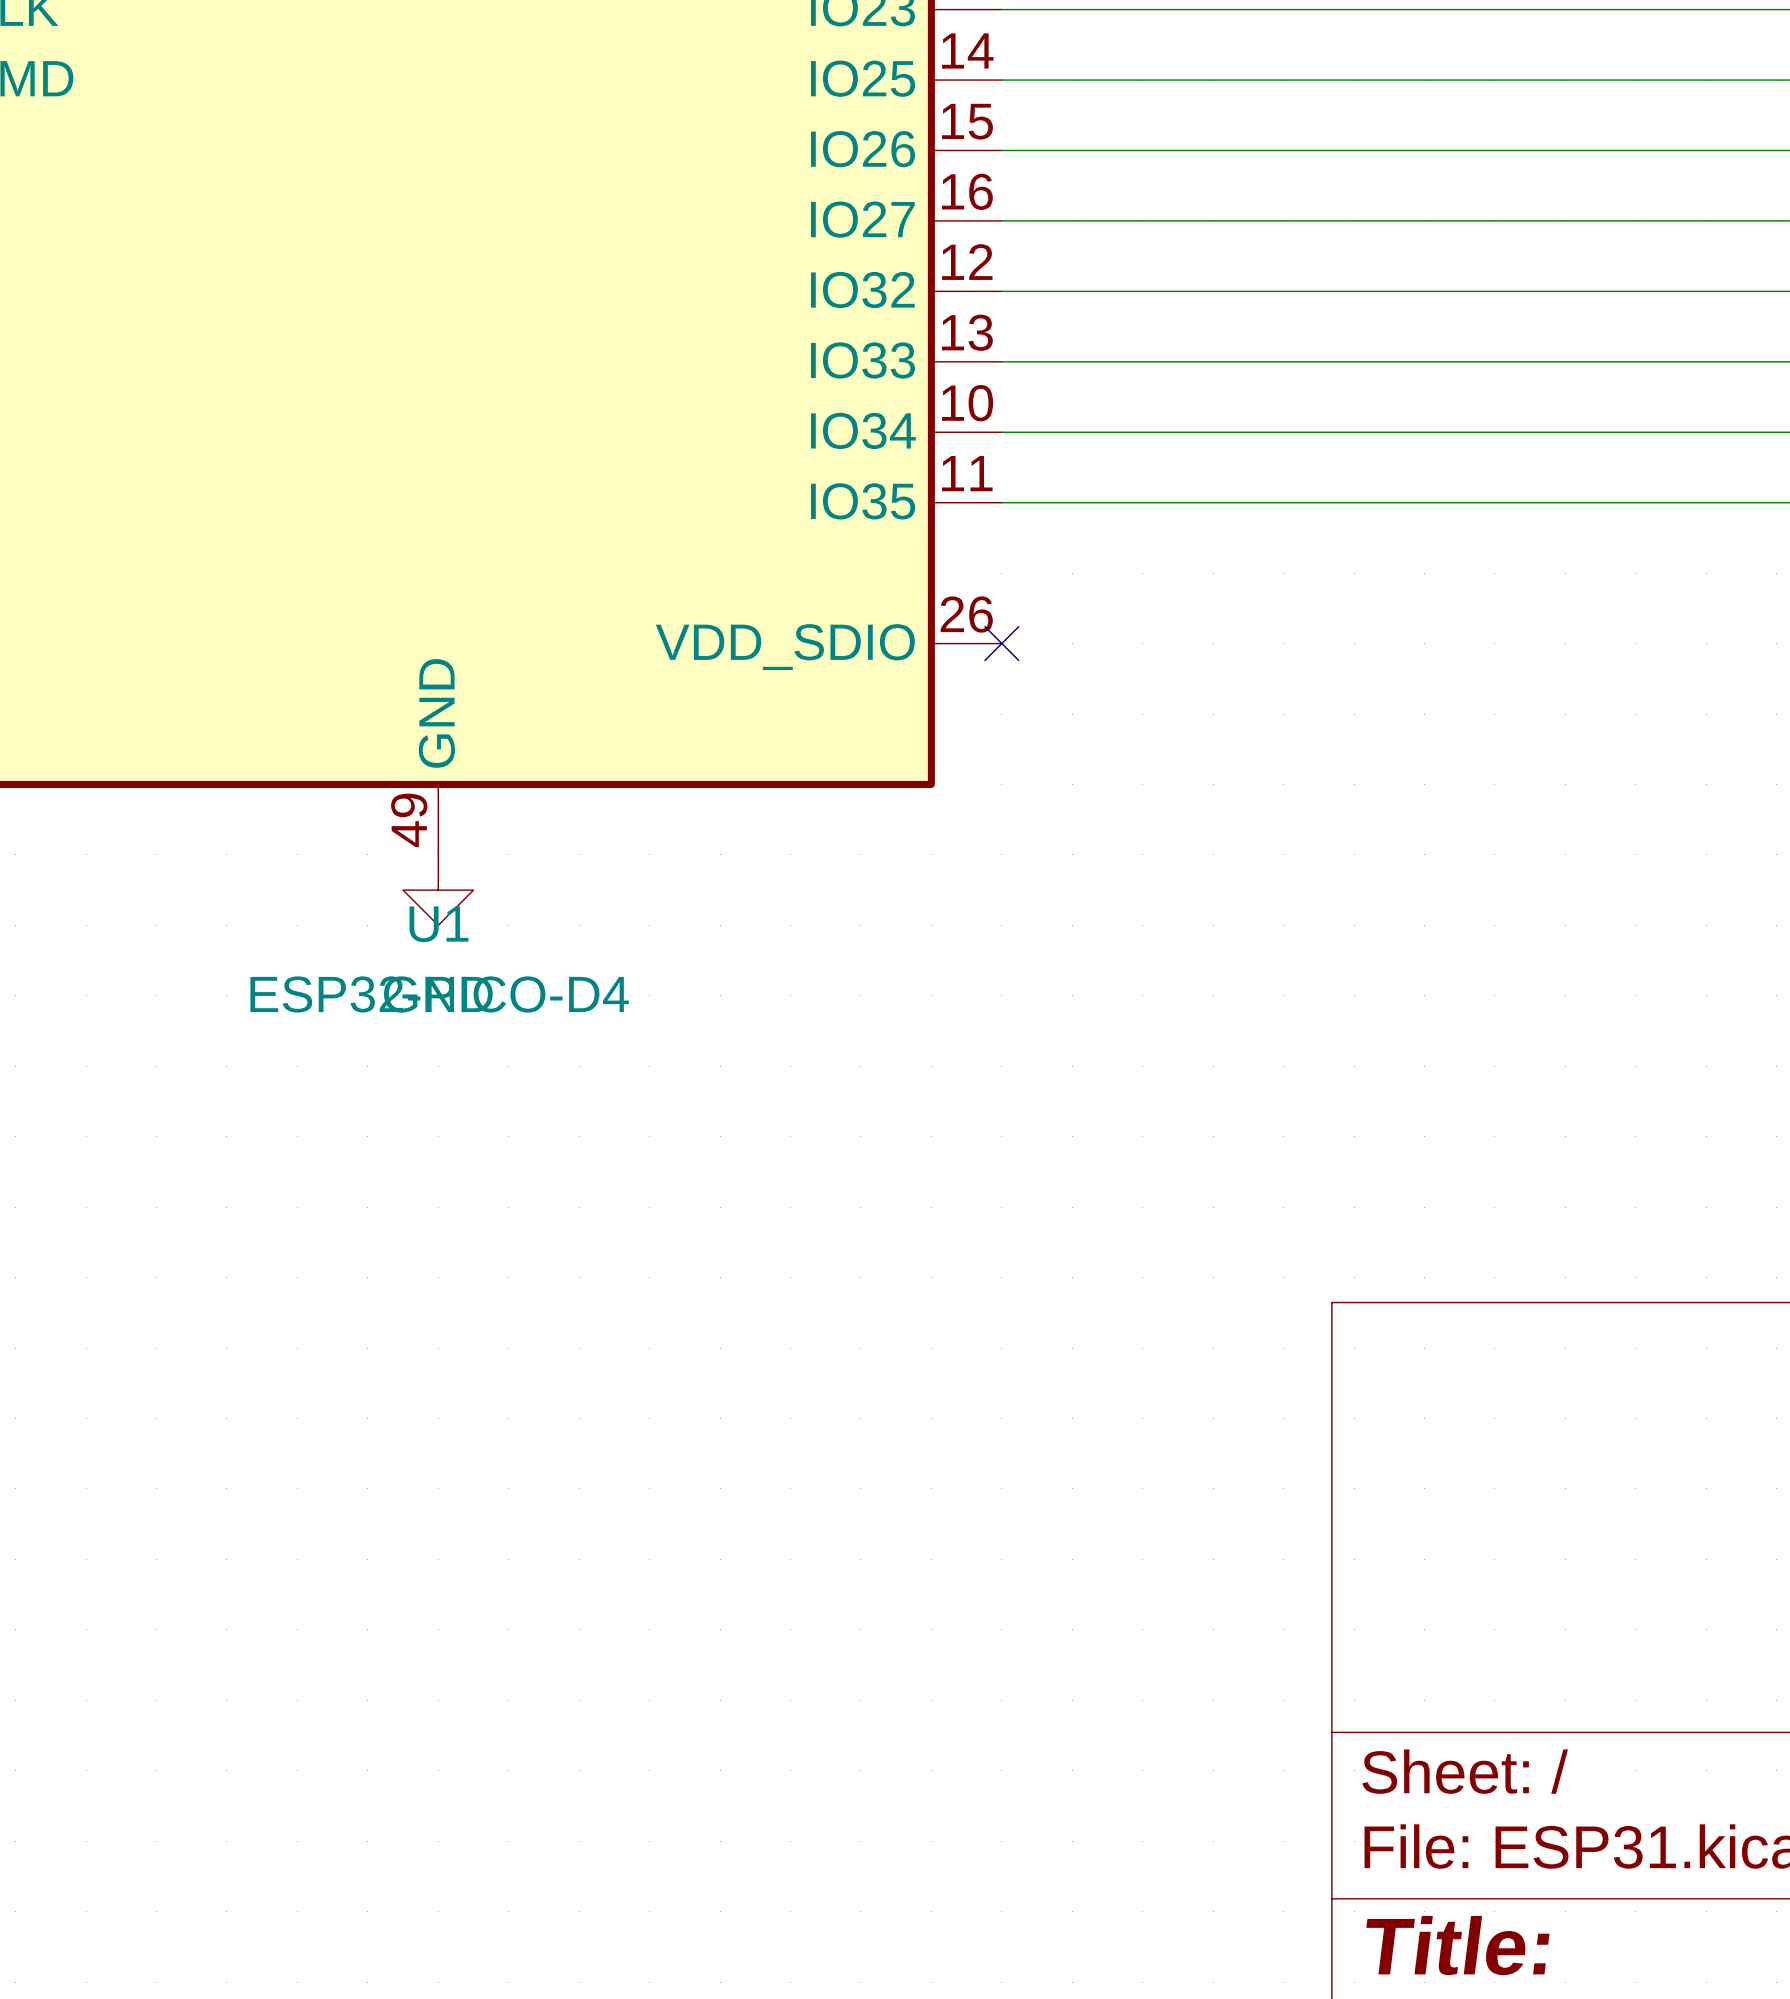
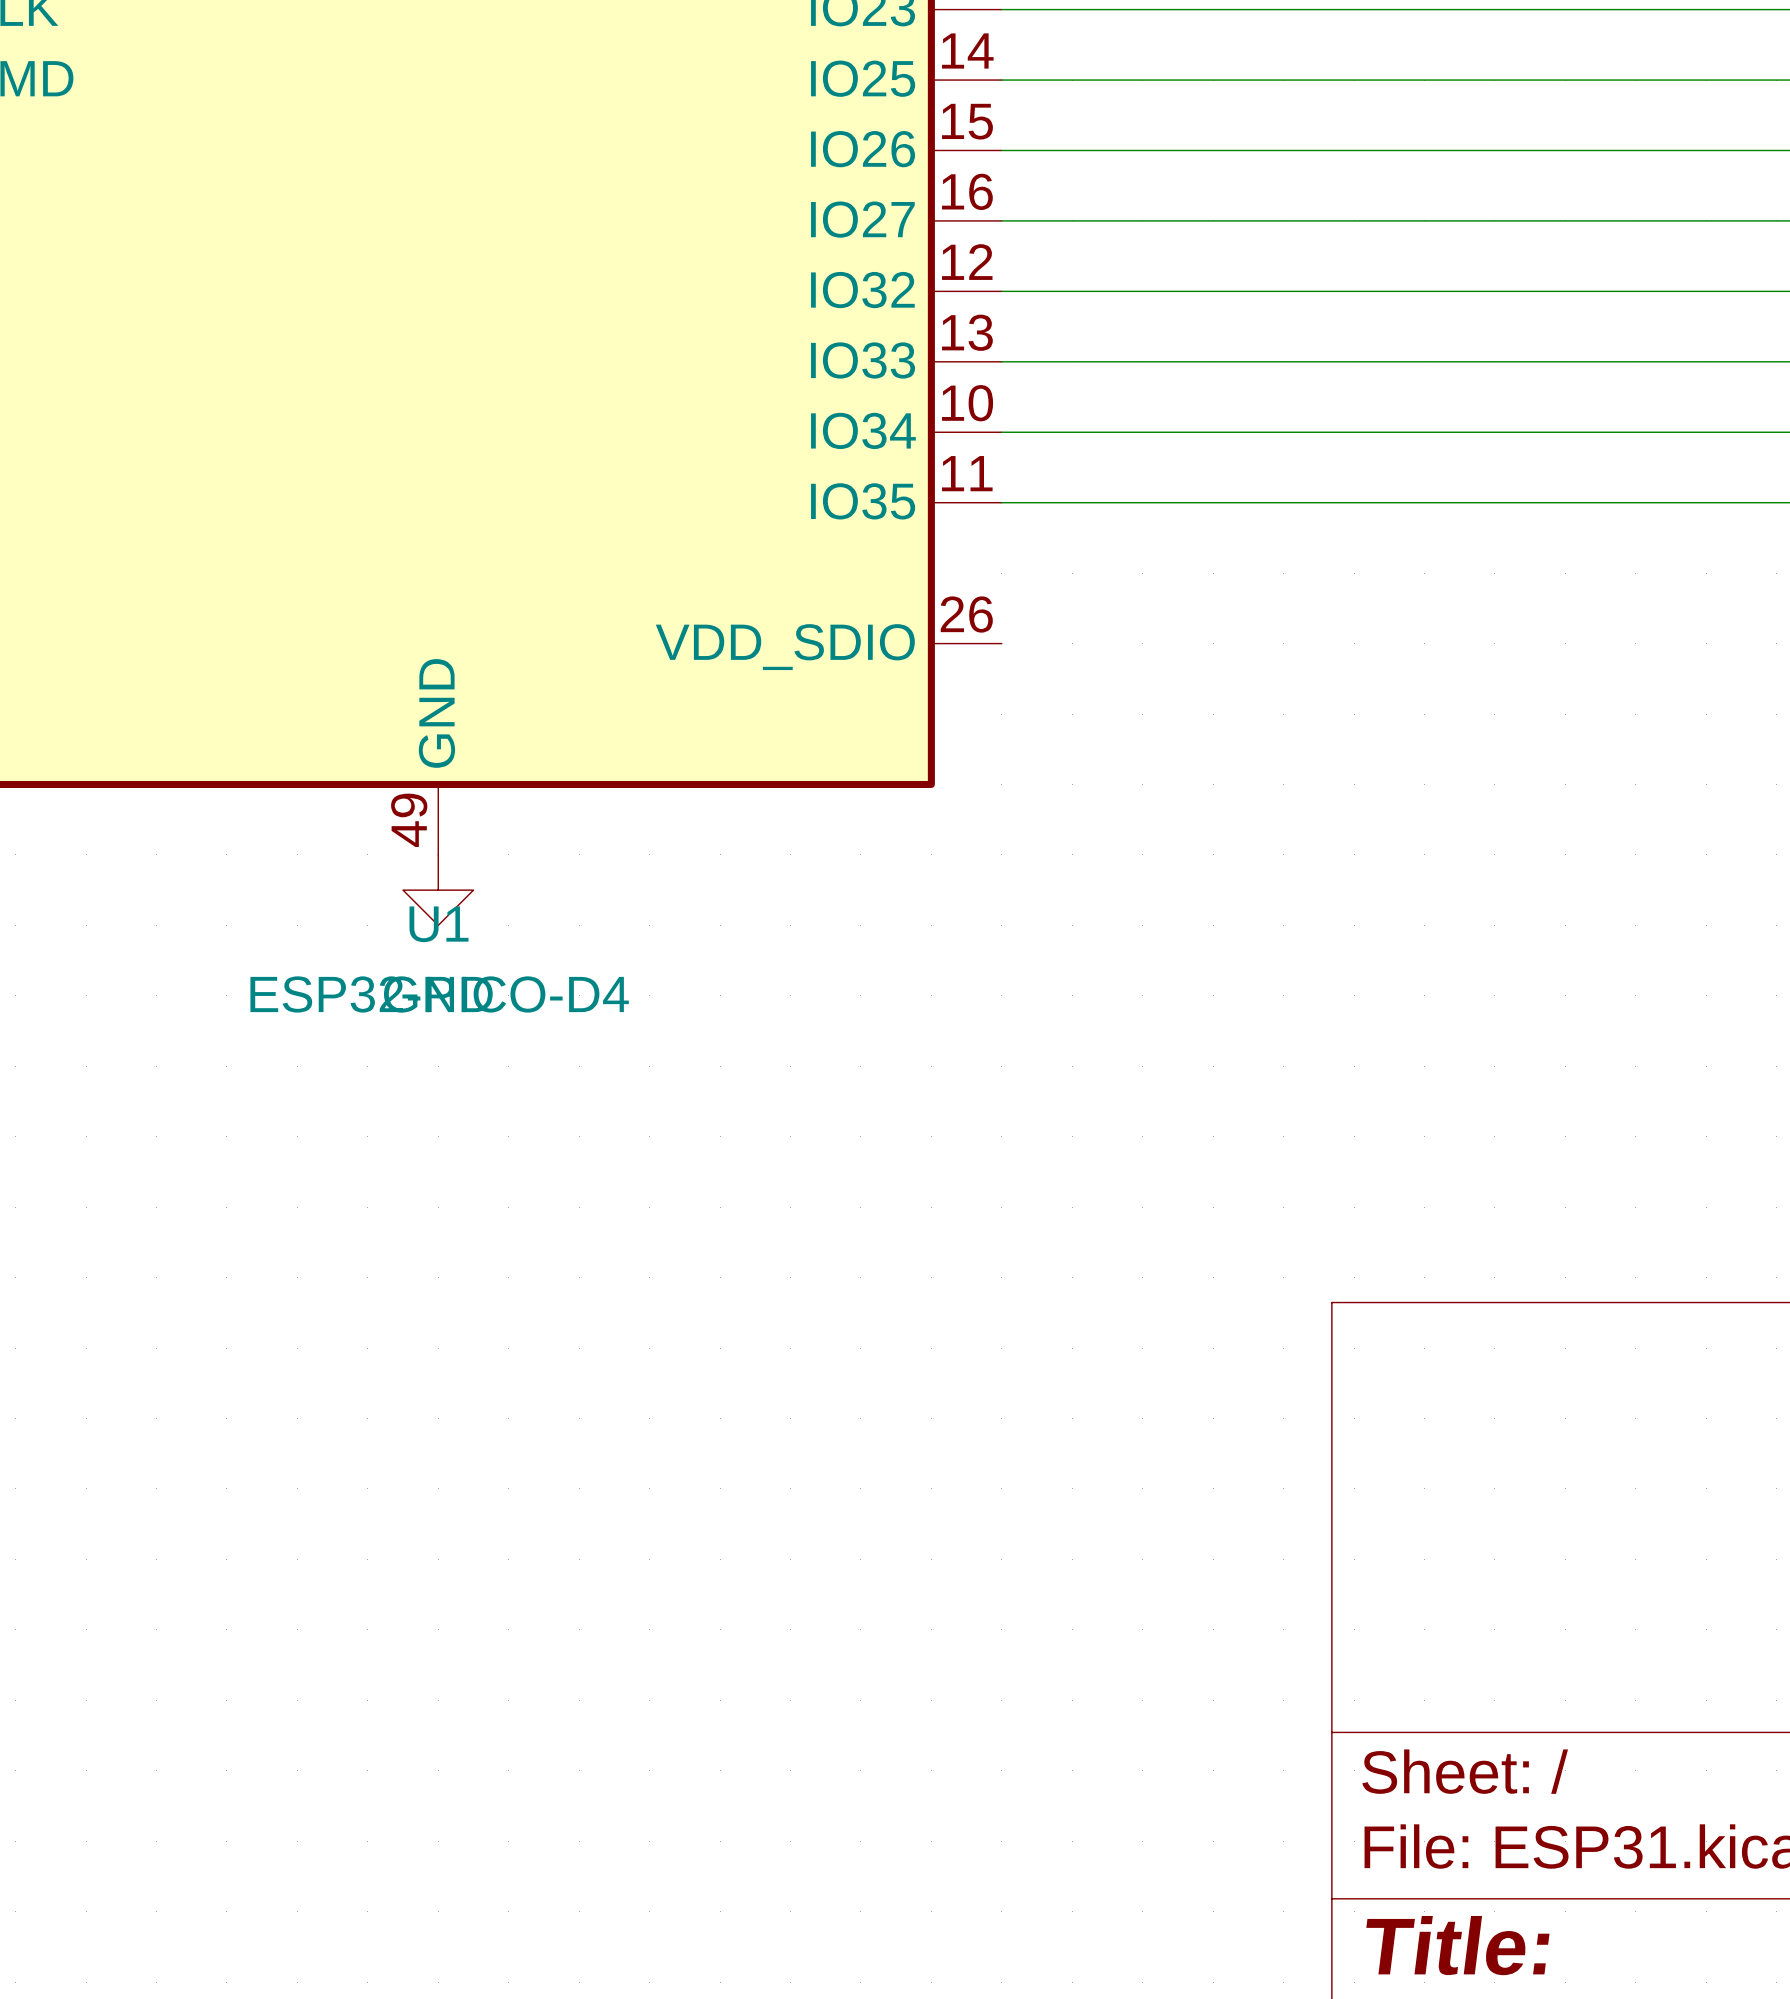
no-connect mark: (1001, 643) -> none

